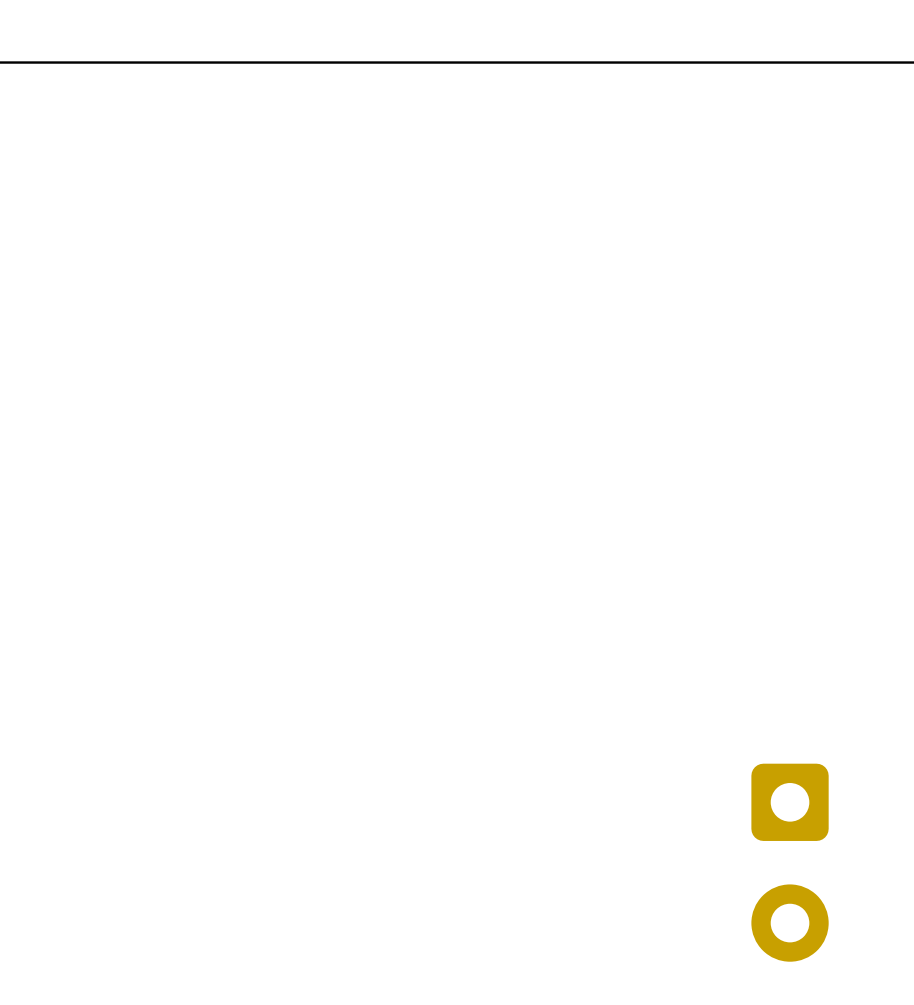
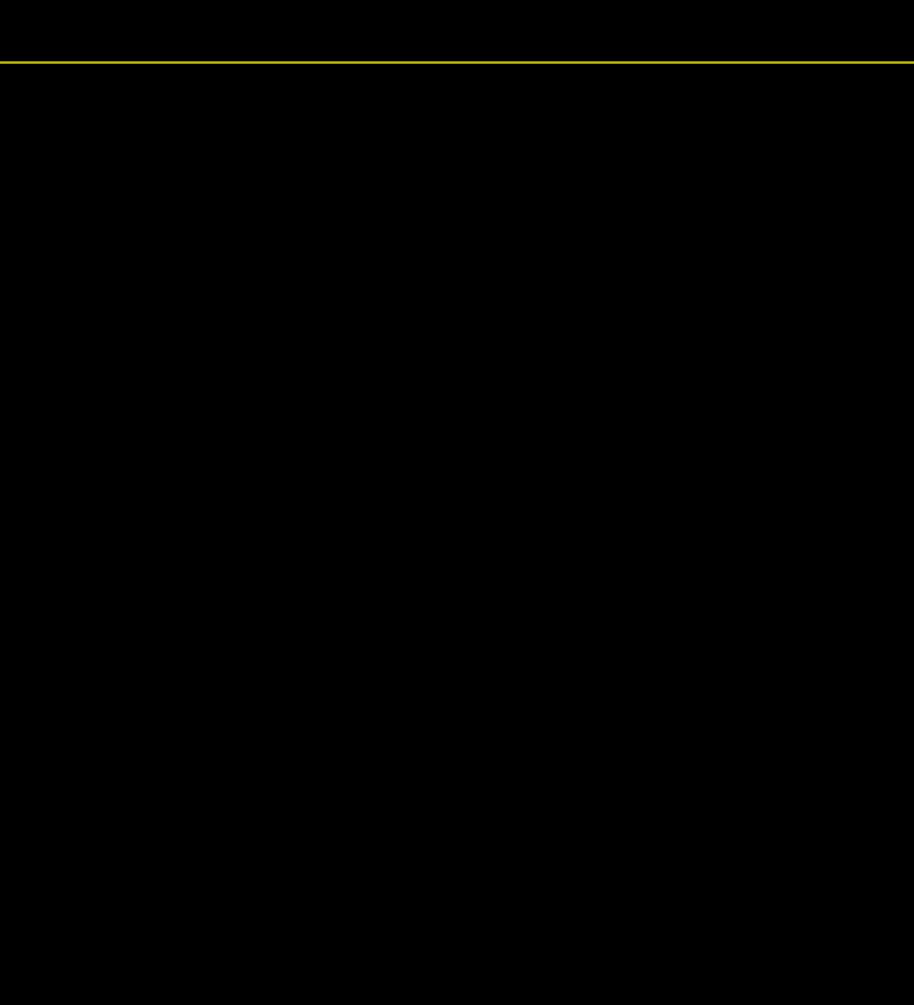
part: (790, 862) -> none

